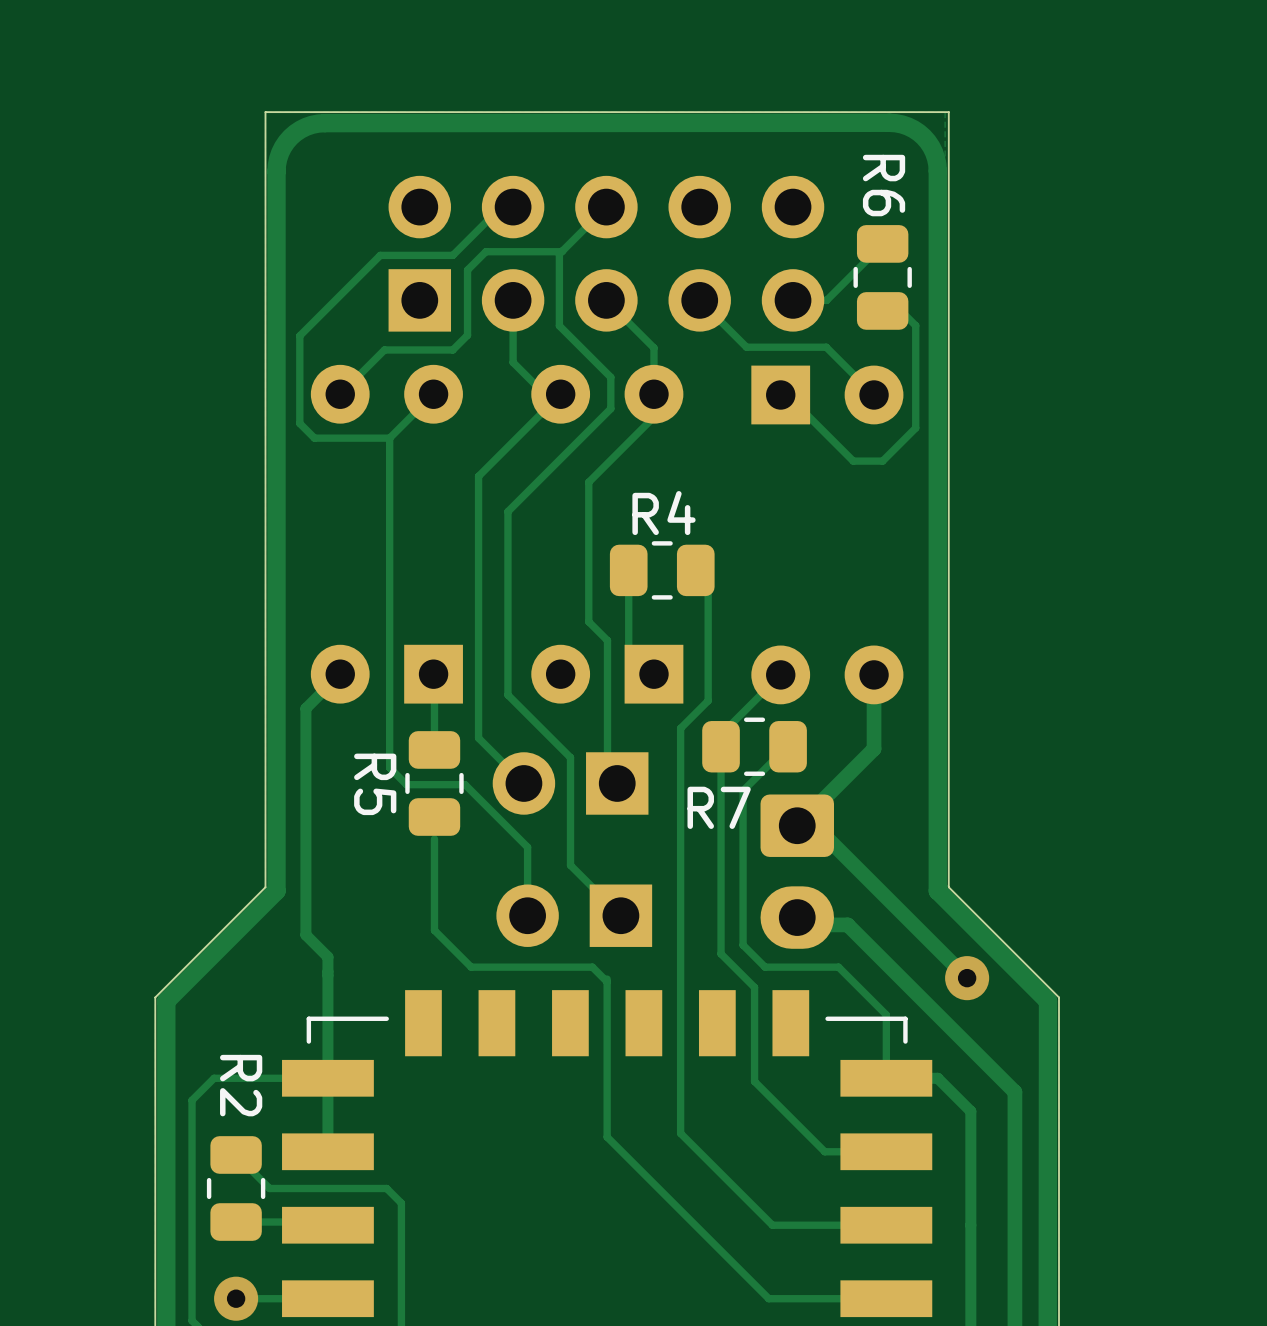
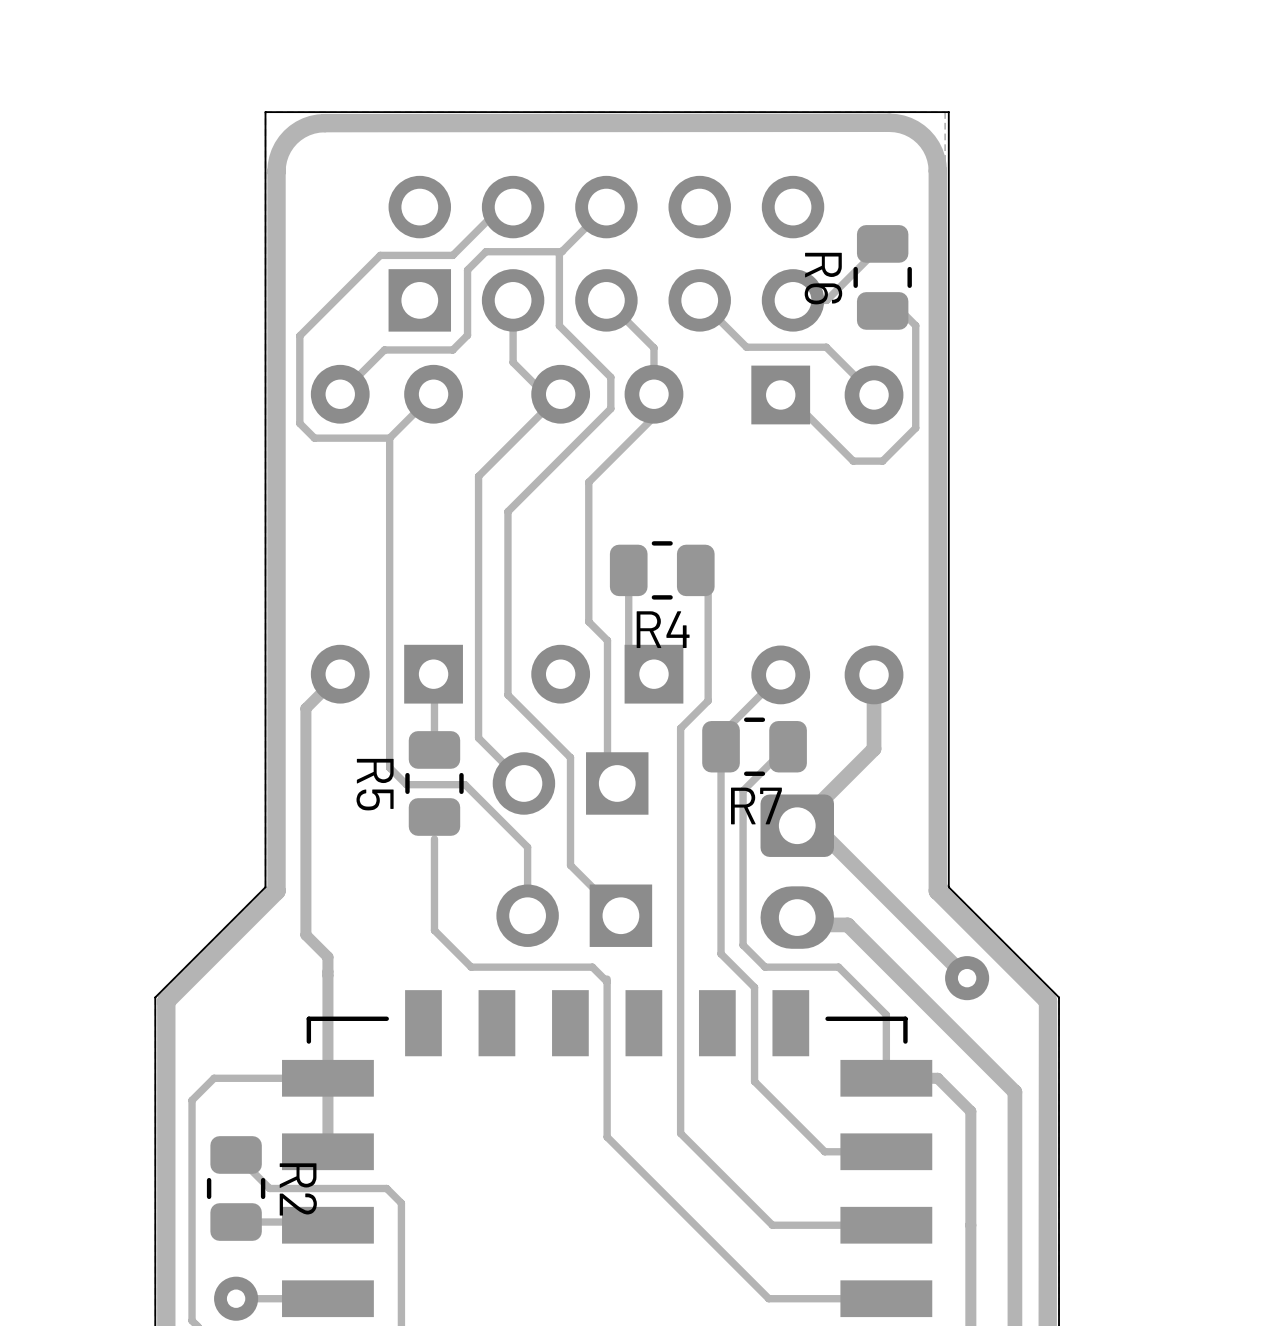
R6 name position: R6 (884, 185) -> R6 (823, 278)
R4 name position: R4 (664, 513) -> R4 (663, 629)
R7 name position: R7 (719, 807) -> R7 (756, 805)
R2 name position: R2 (241, 1085) -> R2 (298, 1189)

